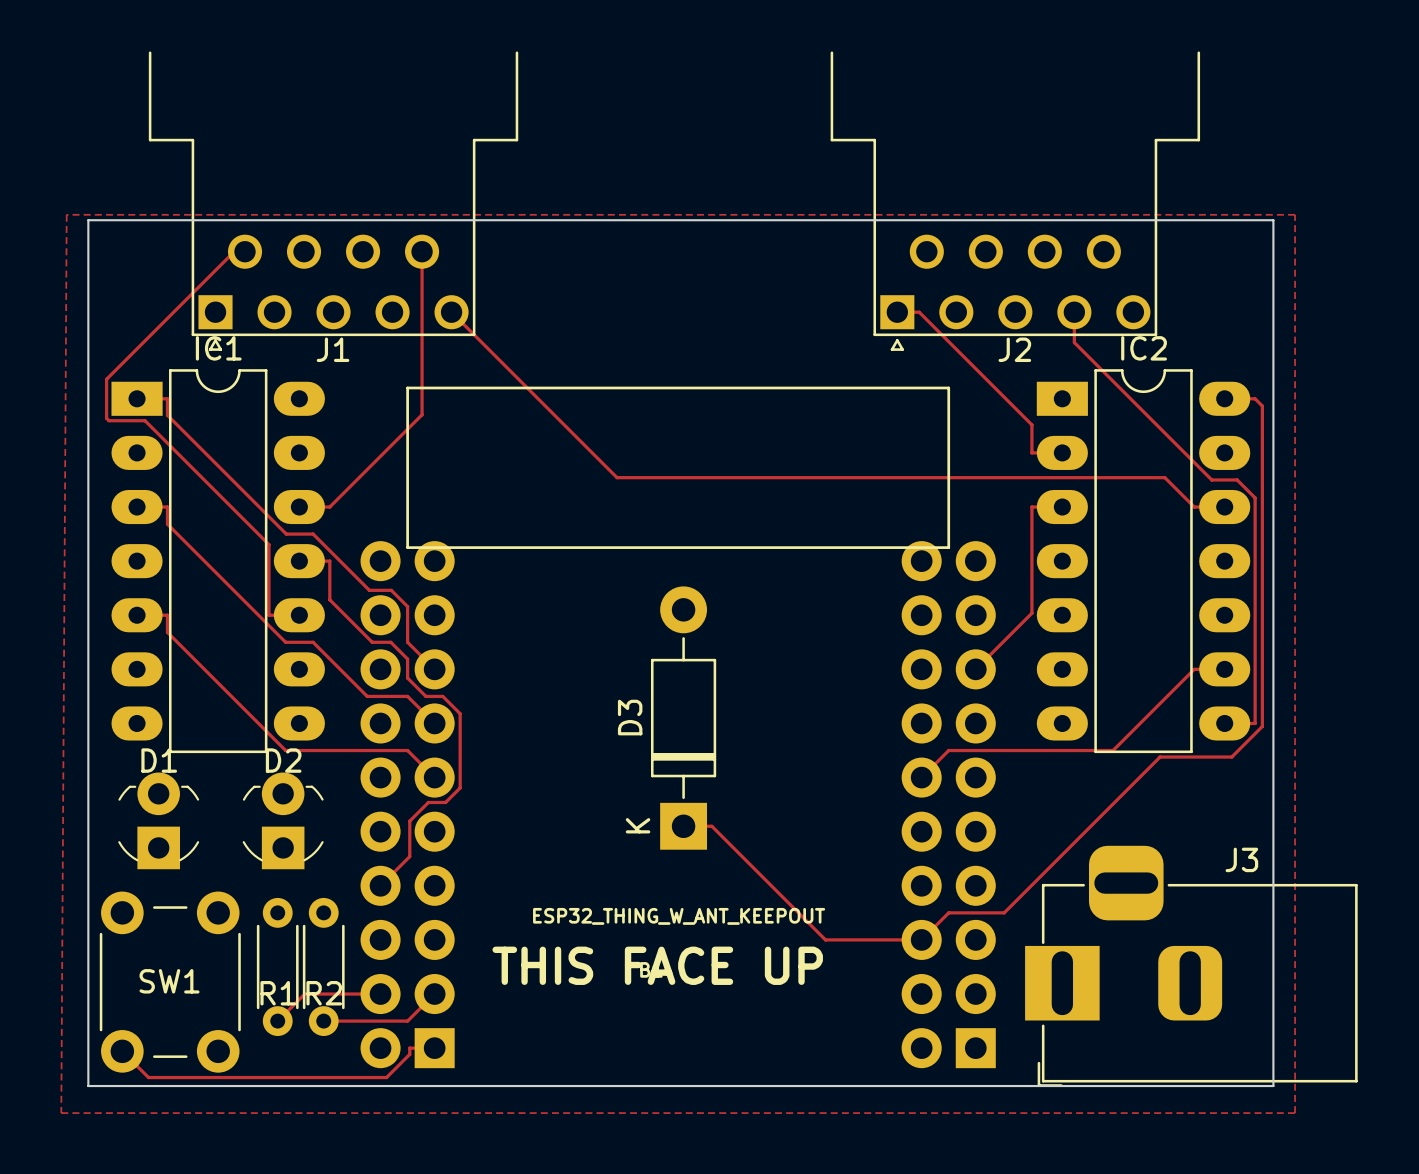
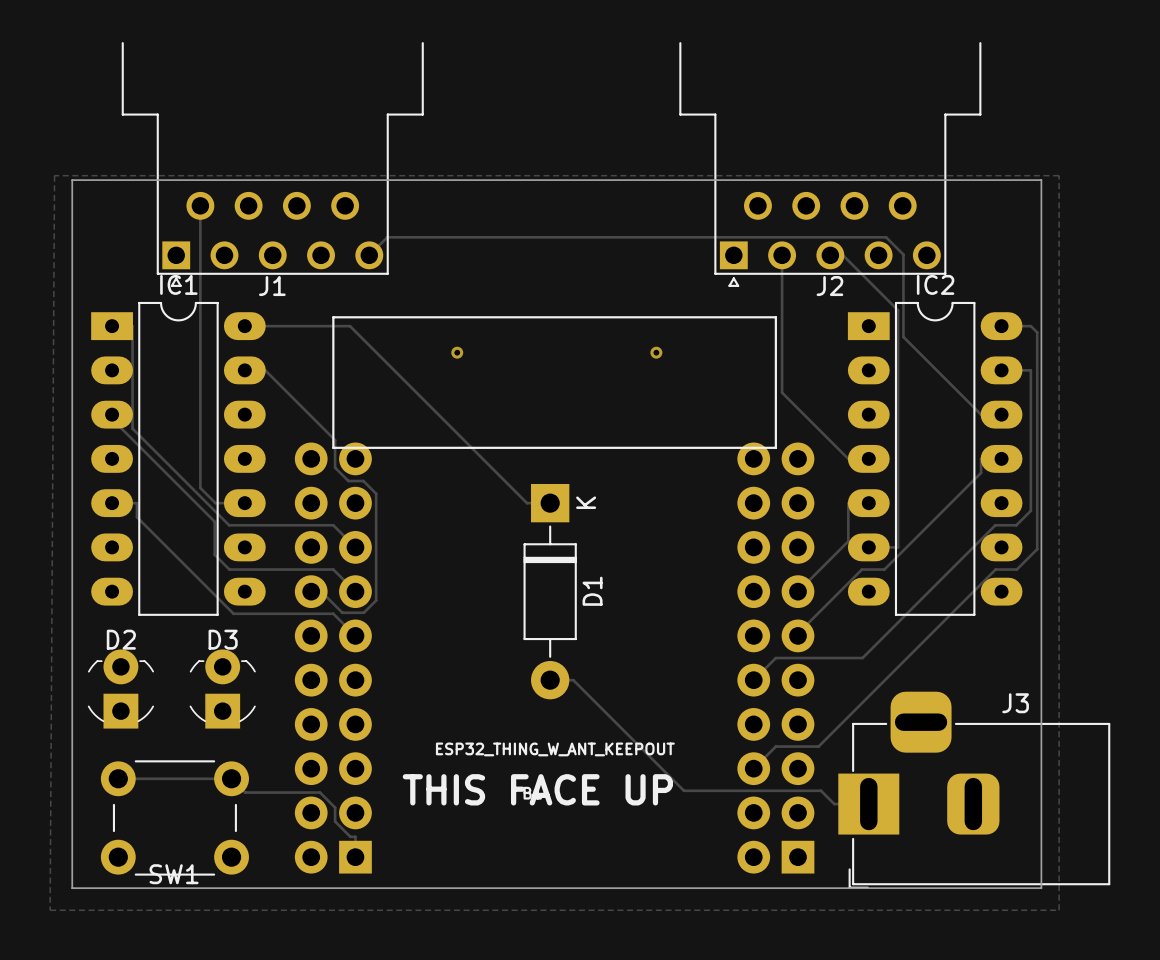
track: (245, 251) (234, 251) (106, 379) (106, 418) (109, 420) (145, 420) (268, 544) (268, 615) -> (200, 205) (200, 488) (215, 503) (219, 503)
track: (422, 251) (422, 414) (329, 507) (299, 507) -> none
track: (451, 312) (617, 477) (1164, 477) (1194, 507) (1199, 507) -> (369, 255) (387, 237) (886, 237) (903, 254) (903, 336) (981, 414)
track: (897, 312) (919, 312) (1031, 424) (1031, 452) (1062, 452) -> none
track: none -> (782, 255) (782, 392) (848, 458) (873, 458)
track: none -> (830, 255) (842, 255) (898, 310) (898, 547) (873, 547)
track: (1074, 312) (1074, 342) (1211, 479) (1237, 479) (1255, 497) (1255, 723) (1224, 723) -> none
track: (162, 398) (167, 398) (167, 415) (286, 534) (313, 534) (369, 590) (391, 590) (407, 606) (407, 642) -> none
track: none -> (240, 326) (350, 326) (527, 503) (550, 503)
track: (1255, 398) (1262, 406) (1262, 726) (1231, 757) (1160, 757) (1004, 912) (1000, 912) -> (1026, 326) (1030, 326) (1037, 332) (1037, 549) (1016, 569) (995, 569) (818, 746)
via: none -> (457, 352)
via: none -> (656, 352)
track: none -> (240, 370) (265, 370) (335, 440) (335, 467) (348, 481) (363, 481) (376, 493) (376, 600) (363, 612) (342, 612) (321, 591) (311, 591)
track: none -> (1005, 370) (1030, 370) (1030, 510) (1016, 525) (995, 525) (862, 658) (775, 658) (753, 680)
track: none -> (107, 414) (214, 521) (214, 554) (229, 569) (300, 569)
track: (137, 507) (167, 507) (167, 524) (285, 642) -> (132, 326) (132, 428) (229, 525) (233, 525)
track: (1062, 507) (1031, 507) (1031, 613) (975, 669) -> none
track: (299, 561) (329, 561) (329, 599) (372, 642) -> none
track: none -> (1005, 458) (981, 458) (981, 472) (884, 569) (861, 569) (798, 633) (798, 635)
D3 footprint: [650, 586, 717, 850] -> [189, 649, 256, 729]
track: none -> (873, 503) (848, 503) (848, 541) (798, 591)
track: (313, 642) (367, 696) -> (256, 525) (304, 525)
track: (390, 642) (407, 659) (407, 678) (425, 696) (442, 696) (460, 713) (460, 787) (445, 802) (428, 802) (409, 821) (409, 856) (380, 885) -> (319, 525) (333, 525)
track: (1224, 669) (1194, 669) (1113, 750) (948, 750) (921, 777) -> none
D3 name position: D3 (630, 717) -> D3 (223, 639)
D1 name position: D1 (159, 760) -> D1 (592, 591)
D1 footprint: [118, 772, 200, 870] -> [523, 483, 577, 700]
D2 position: (283, 820) -> (120, 689)
track: (683, 826) (711, 826) (825, 939) (921, 939) -> none
track: none -> (550, 680) (573, 680) (683, 790) (821, 790) (834, 804) (868, 804)
R1: (277, 966) -> none
R2: (323, 966) -> none
SW1 name position: SW1 (169, 981) -> SW1 (174, 874)
SW1 rotation: 0° (170, 982) -> 90° clockwise (174, 817)
track: (380, 994) (304, 994) (277, 1021) -> none
track: (434, 994) (407, 1021) (323, 1021) -> none
track: (434, 1048) (409, 1048) (409, 1054) (386, 1077) (148, 1077) (122, 1051) -> (355, 857) (355, 836) (350, 836) (335, 821) (335, 807) (320, 792) (245, 792) (231, 778) (118, 778)

